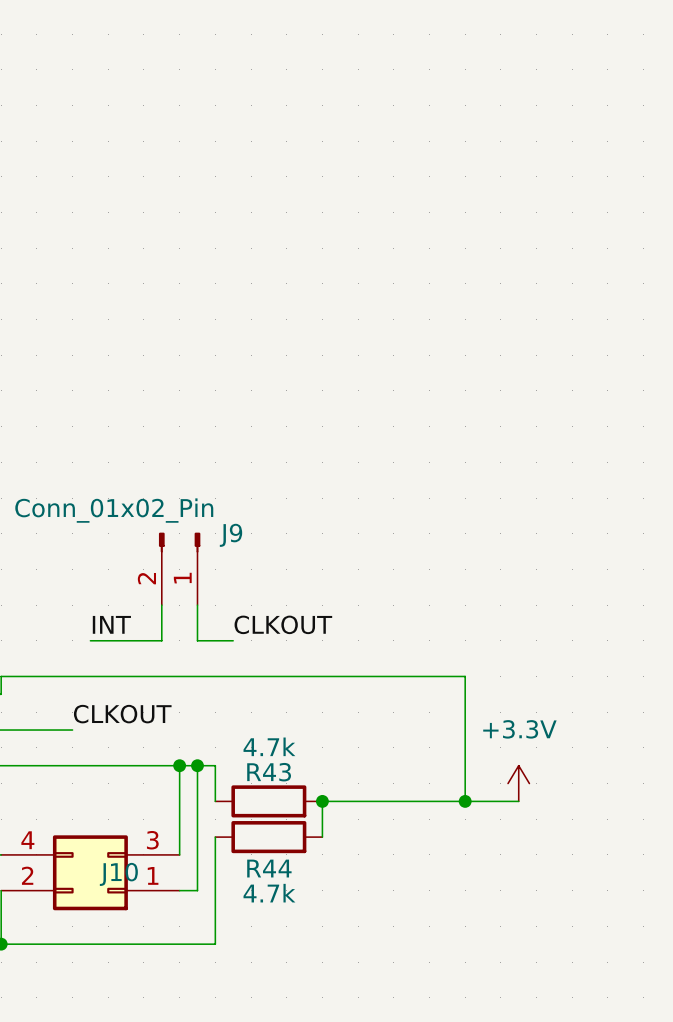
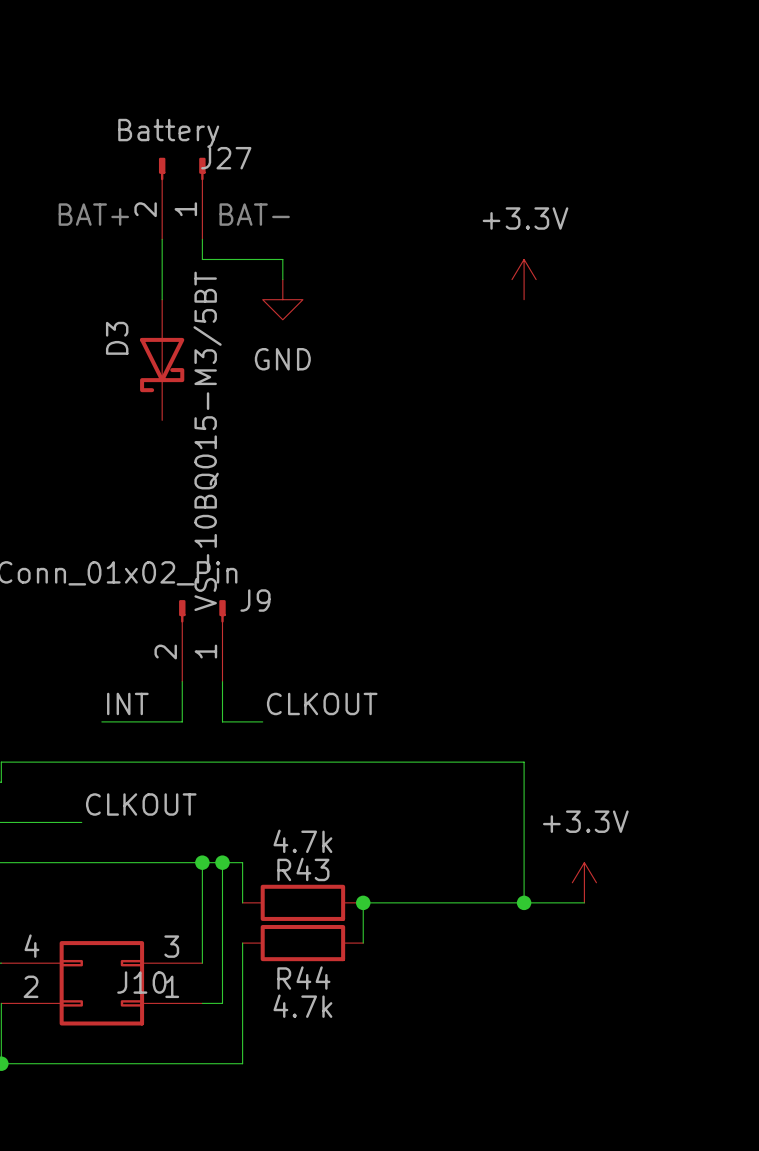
J27: none -> Battery (182, 198)
text: none -> BAT+ (93, 214)
text: none -> BAT- (254, 214)
wire: none -> (162, 239) (162, 299)
wire: none -> (202, 239) (202, 259) (282, 259) (282, 279)
power symbol: none -> +3.3V (524, 279)
power symbol: none -> GND (282, 299)
D3: none -> VS-10BQ015-M3/5BT (162, 360)

